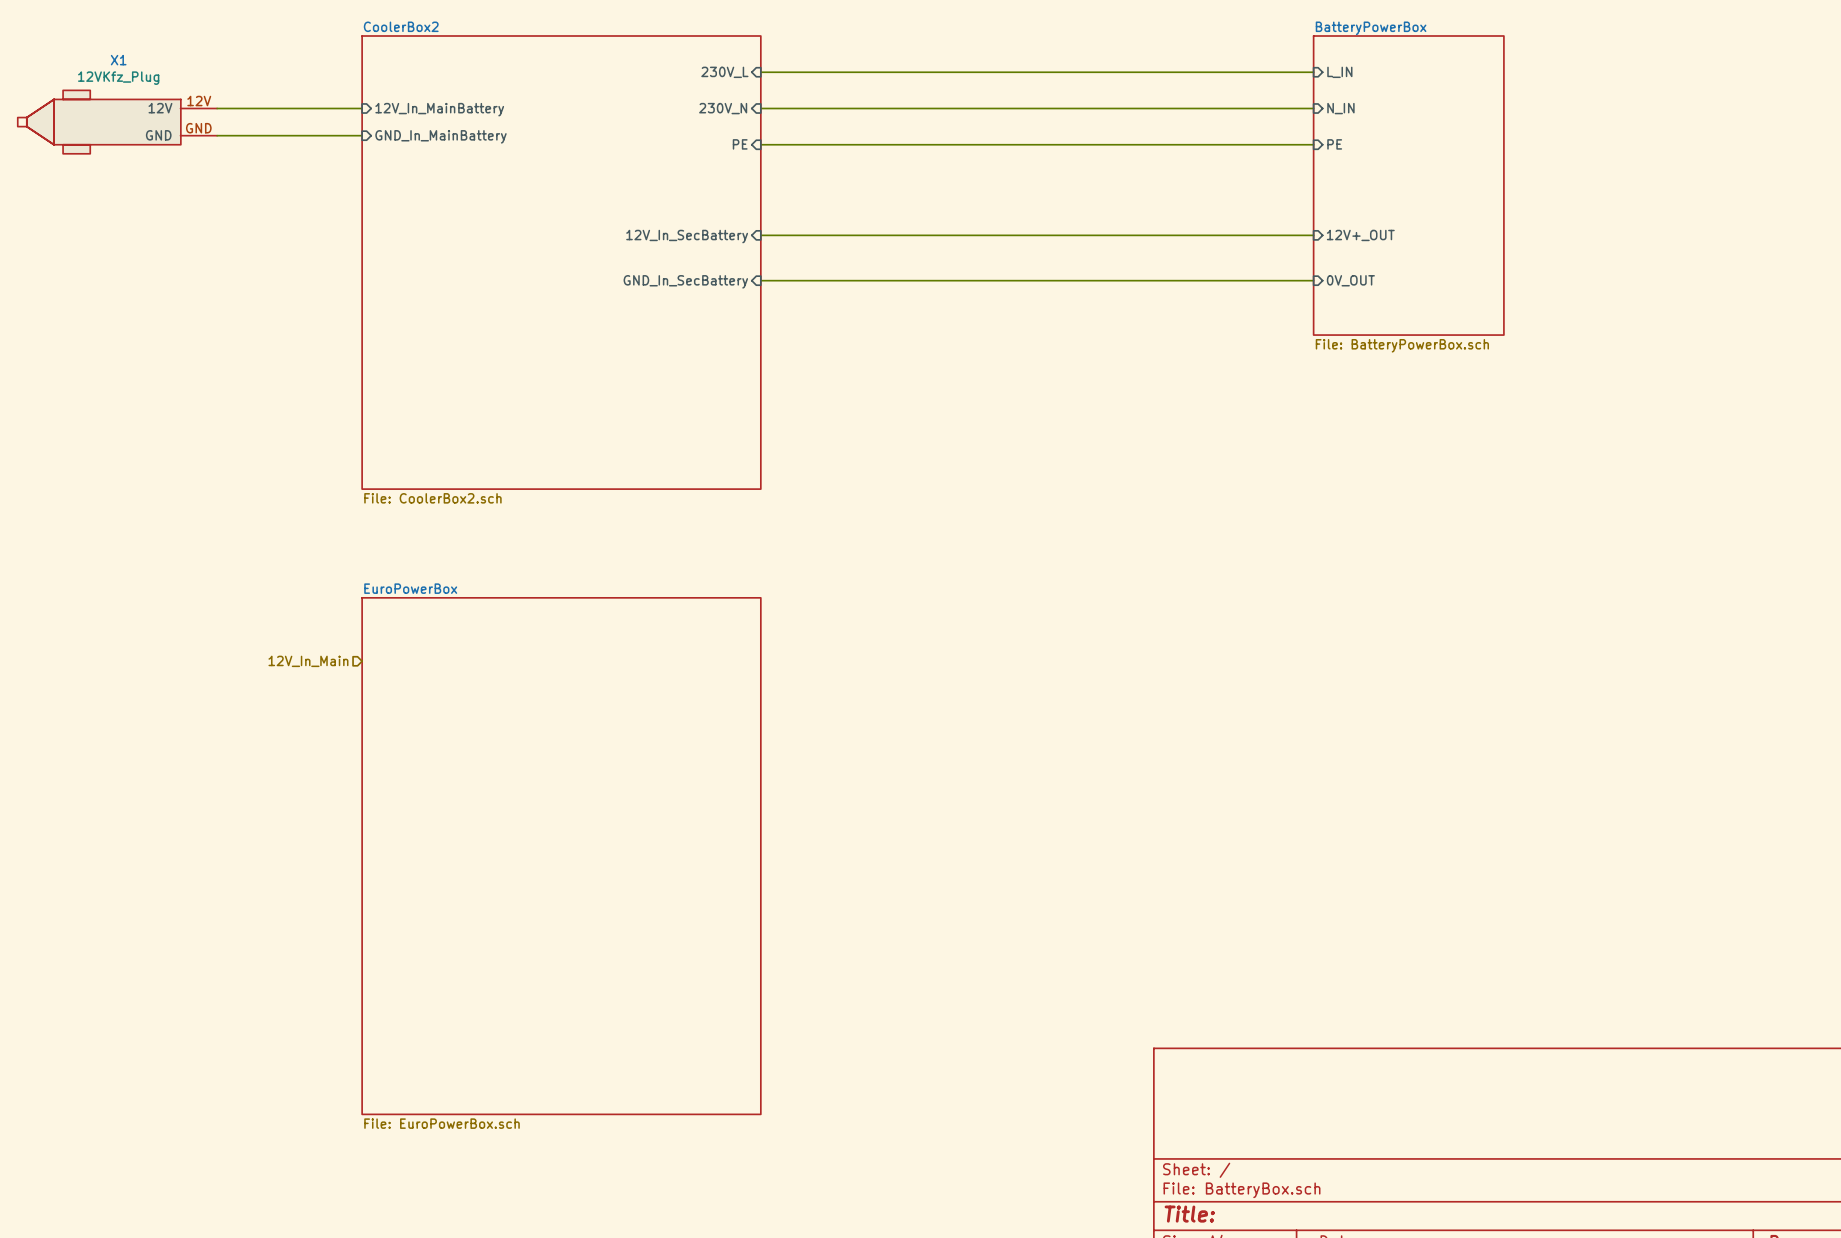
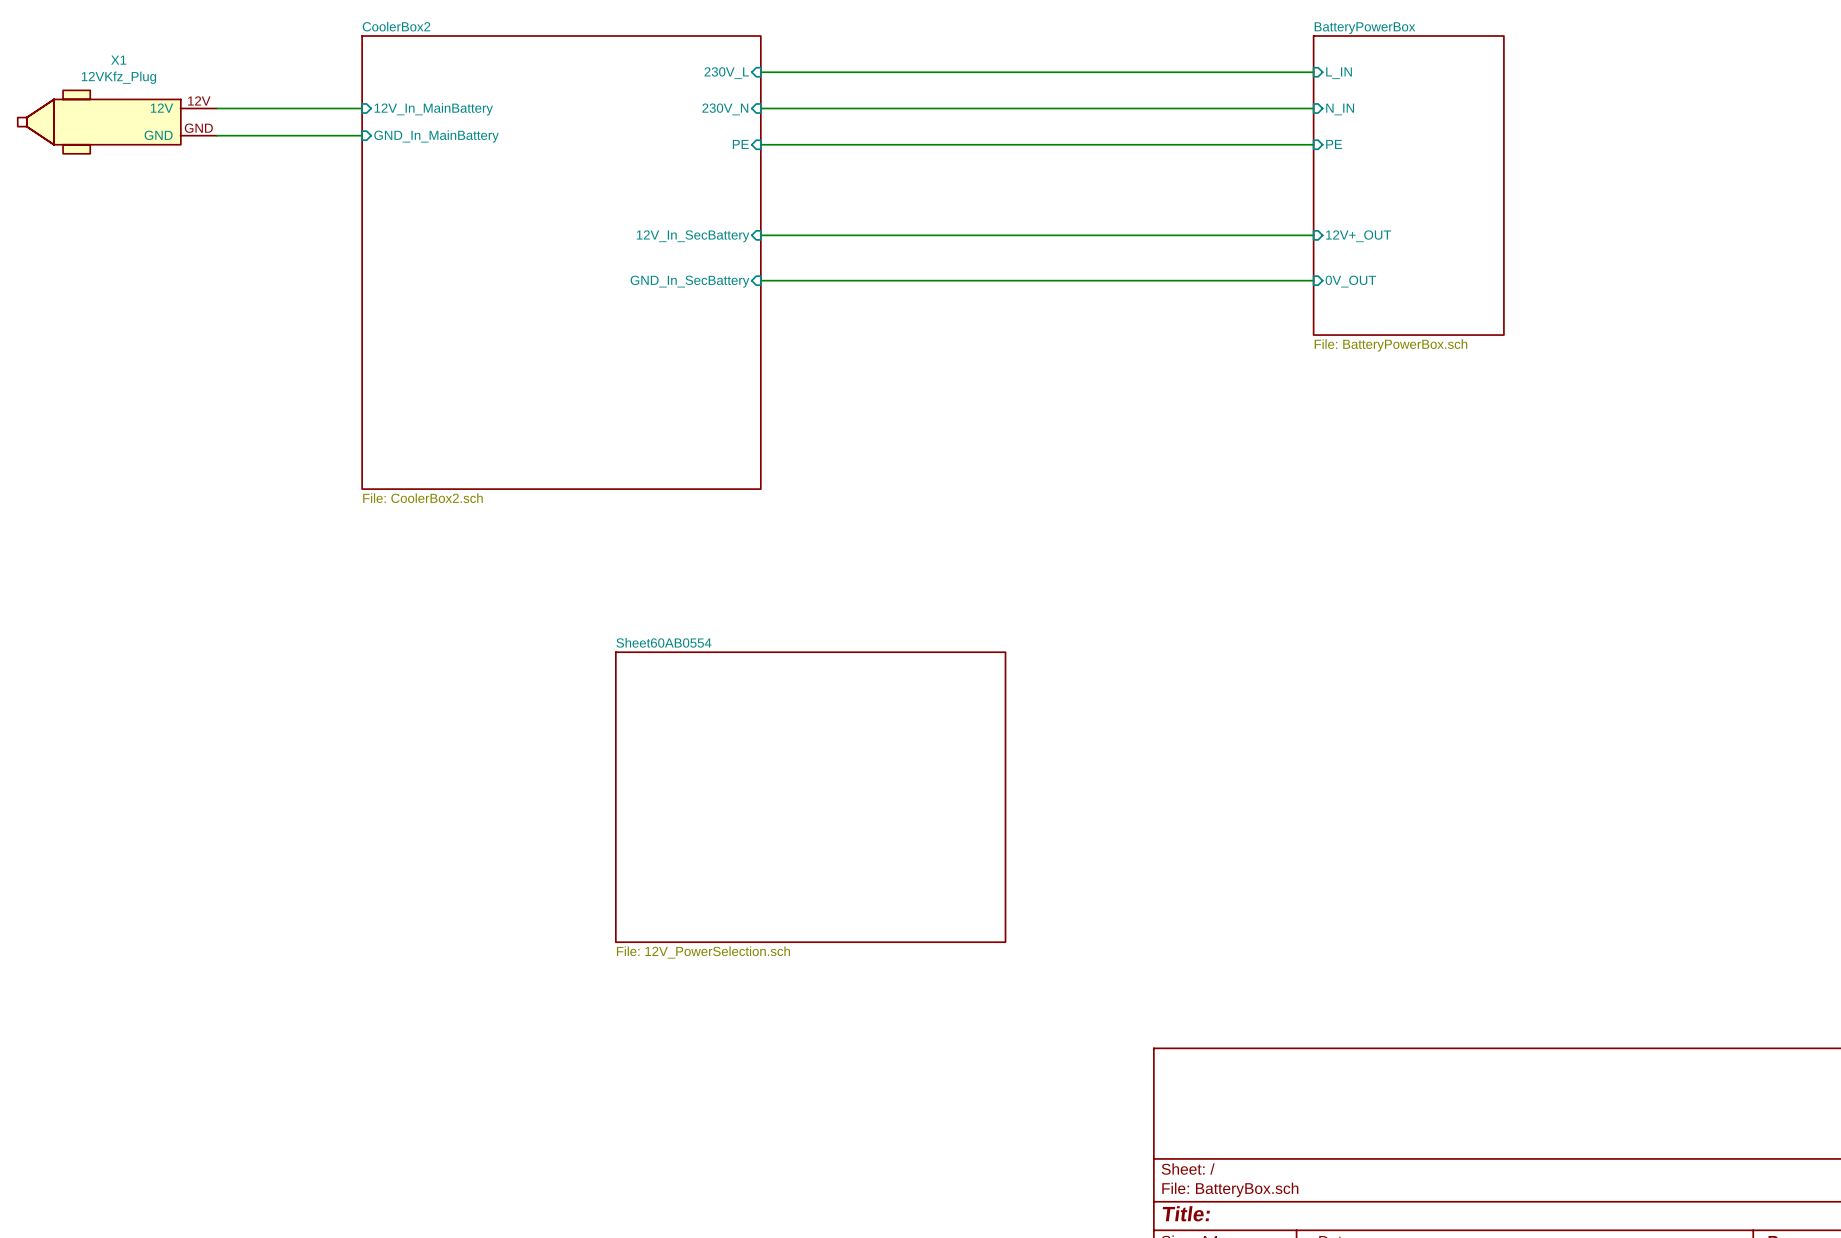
hierarchical label: 12V_In_Main (308, 661) -> none
sheet Sheet60AB0554: none -> File: 12V_PowerSelection.sch (810, 797)
sheet EuroPowerBox: File: EuroPowerBox.sch (561, 856) -> none

